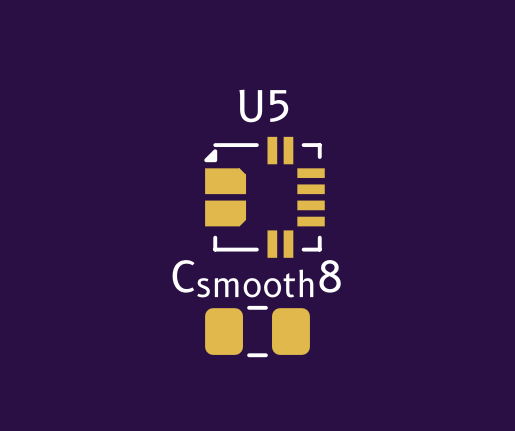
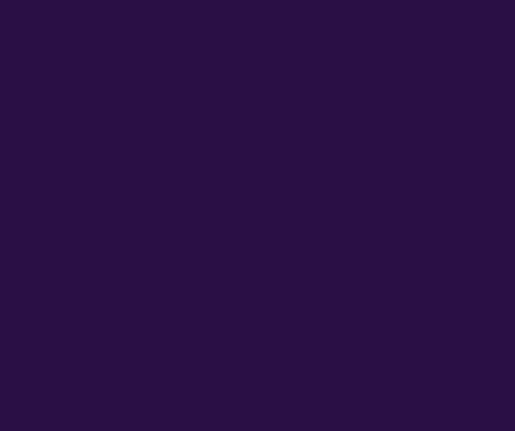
U5: (264, 197) -> none
Csmooth8: (257, 331) -> none

